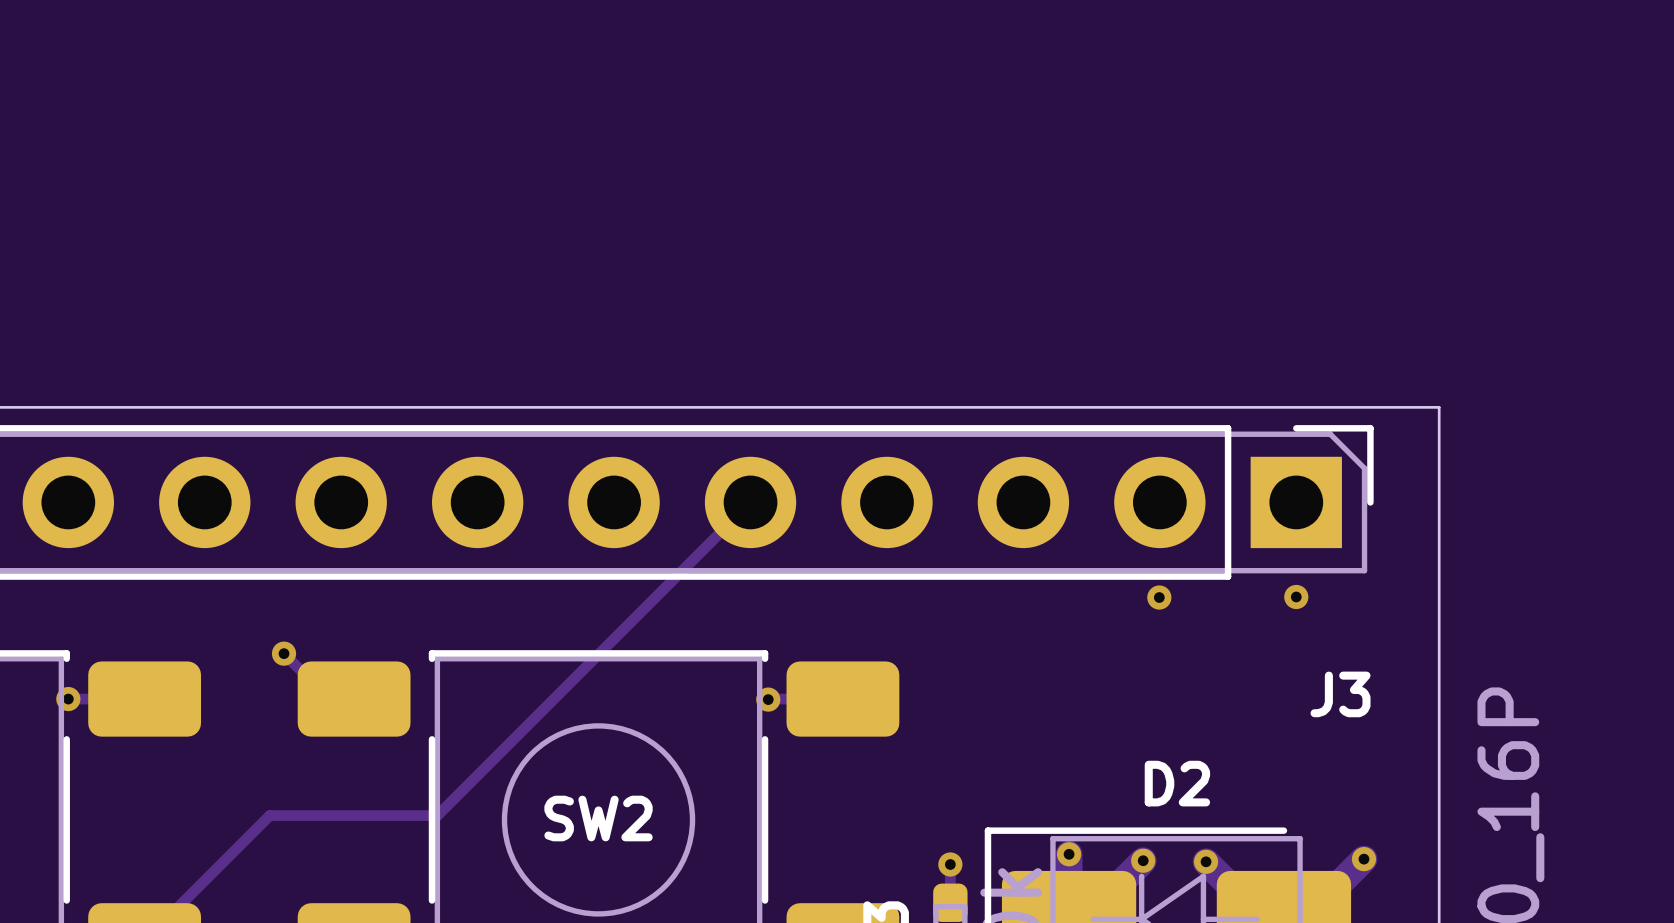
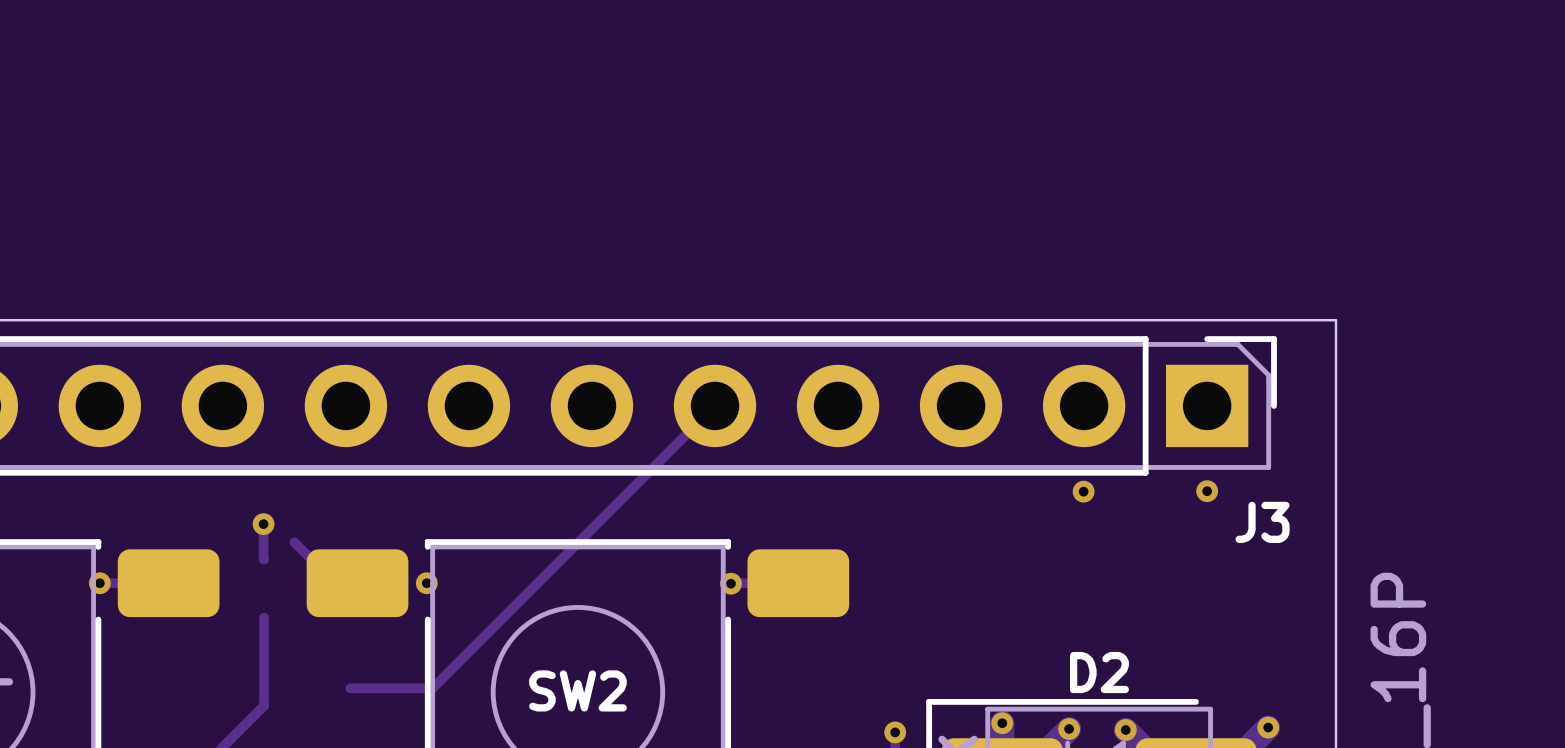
track: none -> (263, 524) (263, 559)
via position: (284, 653) -> (263, 524)
J3 name position: J3 (1340, 694) -> J3 (1262, 522)
via: none -> (426, 583)
D2 name position: D2 (1177, 783) -> D2 (1099, 672)
track: (346, 815) (269, 815) (250, 834) -> (264, 617) (264, 705)

